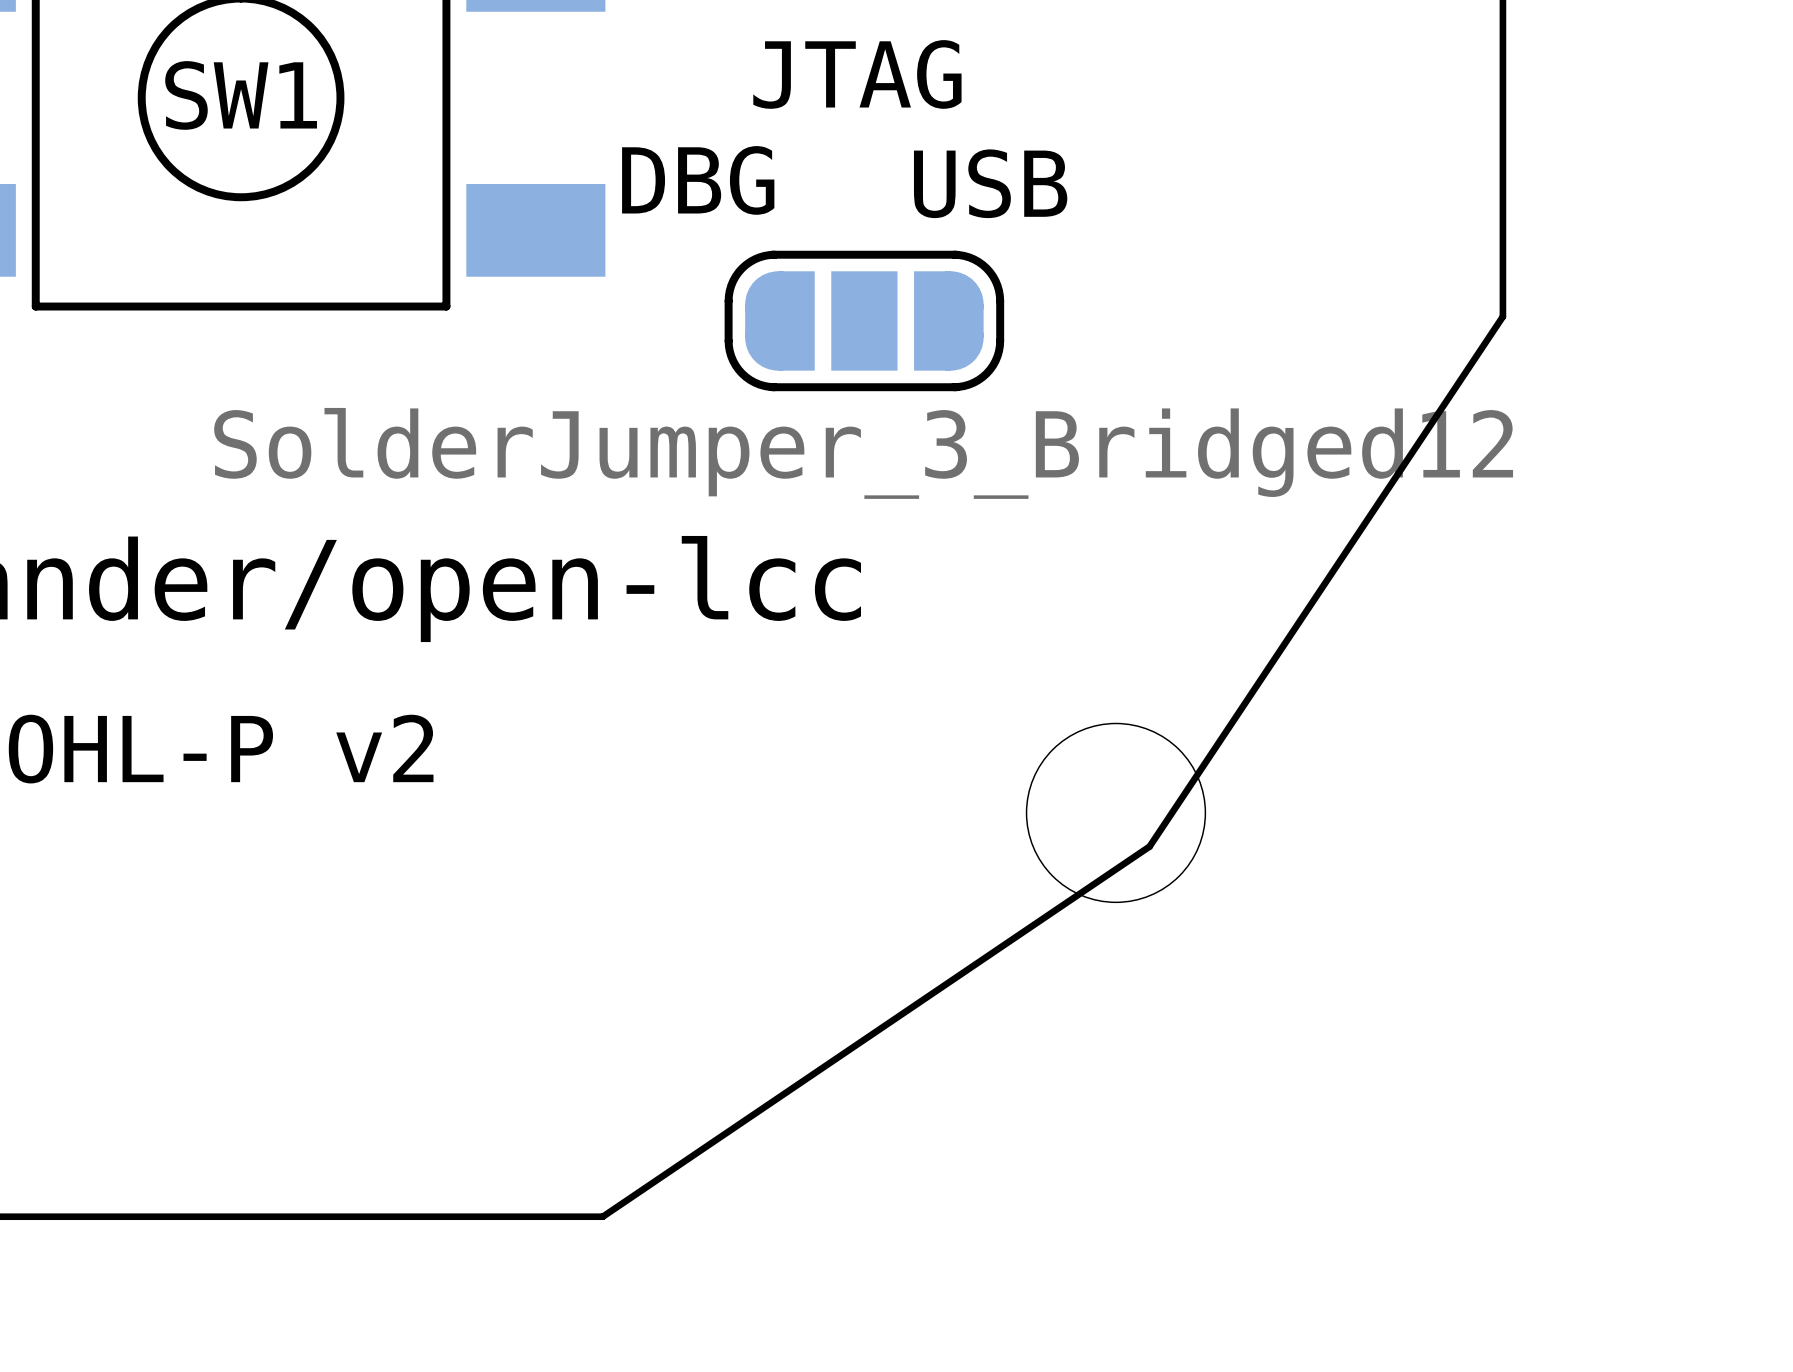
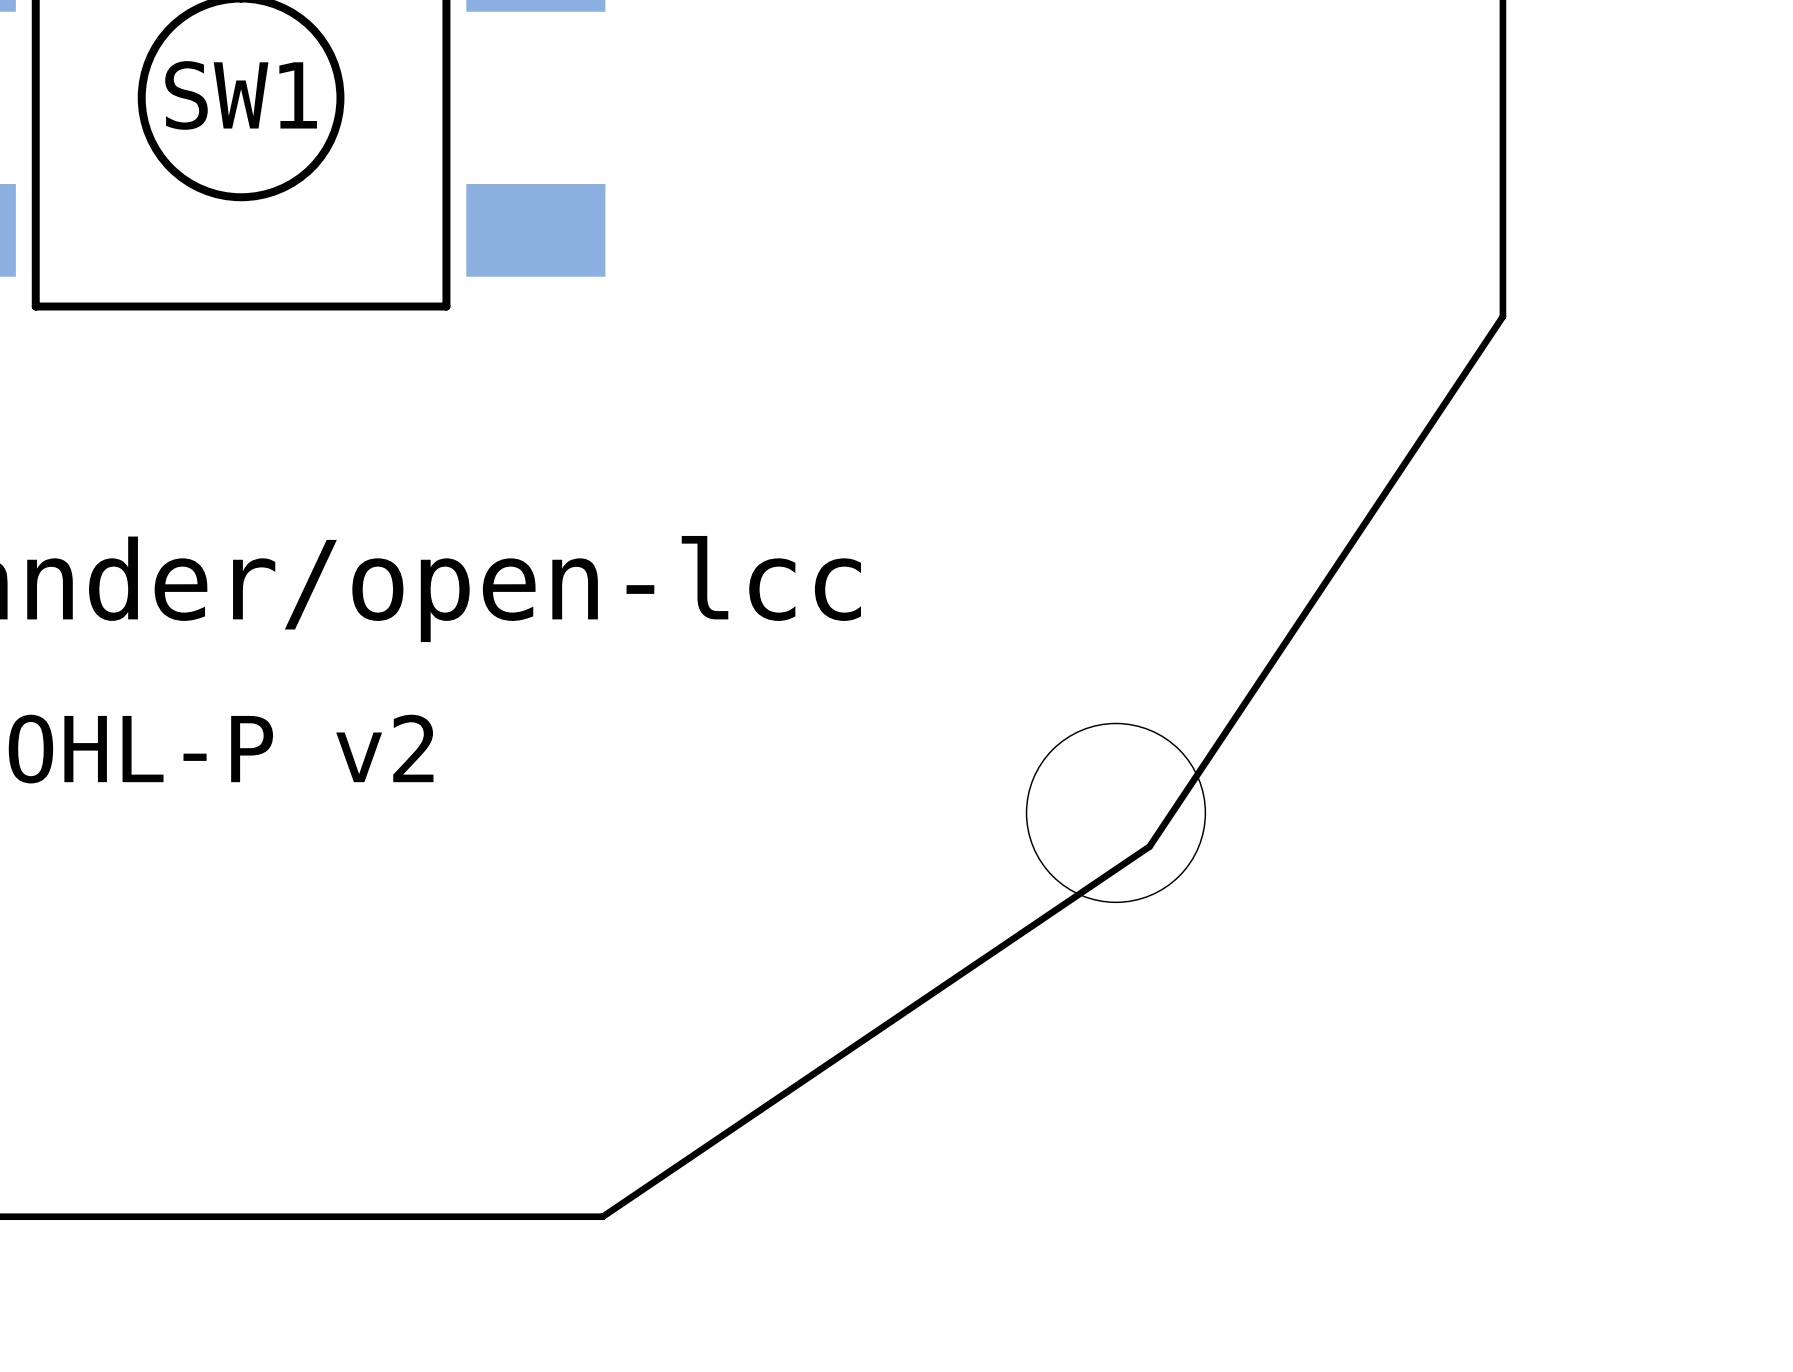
text: JTAG (857, 74) -> none
text: DBG (698, 180) -> none
text: USB (990, 183) -> none
part: SolderJumper_3_Bridged12 (864, 320) -> none

